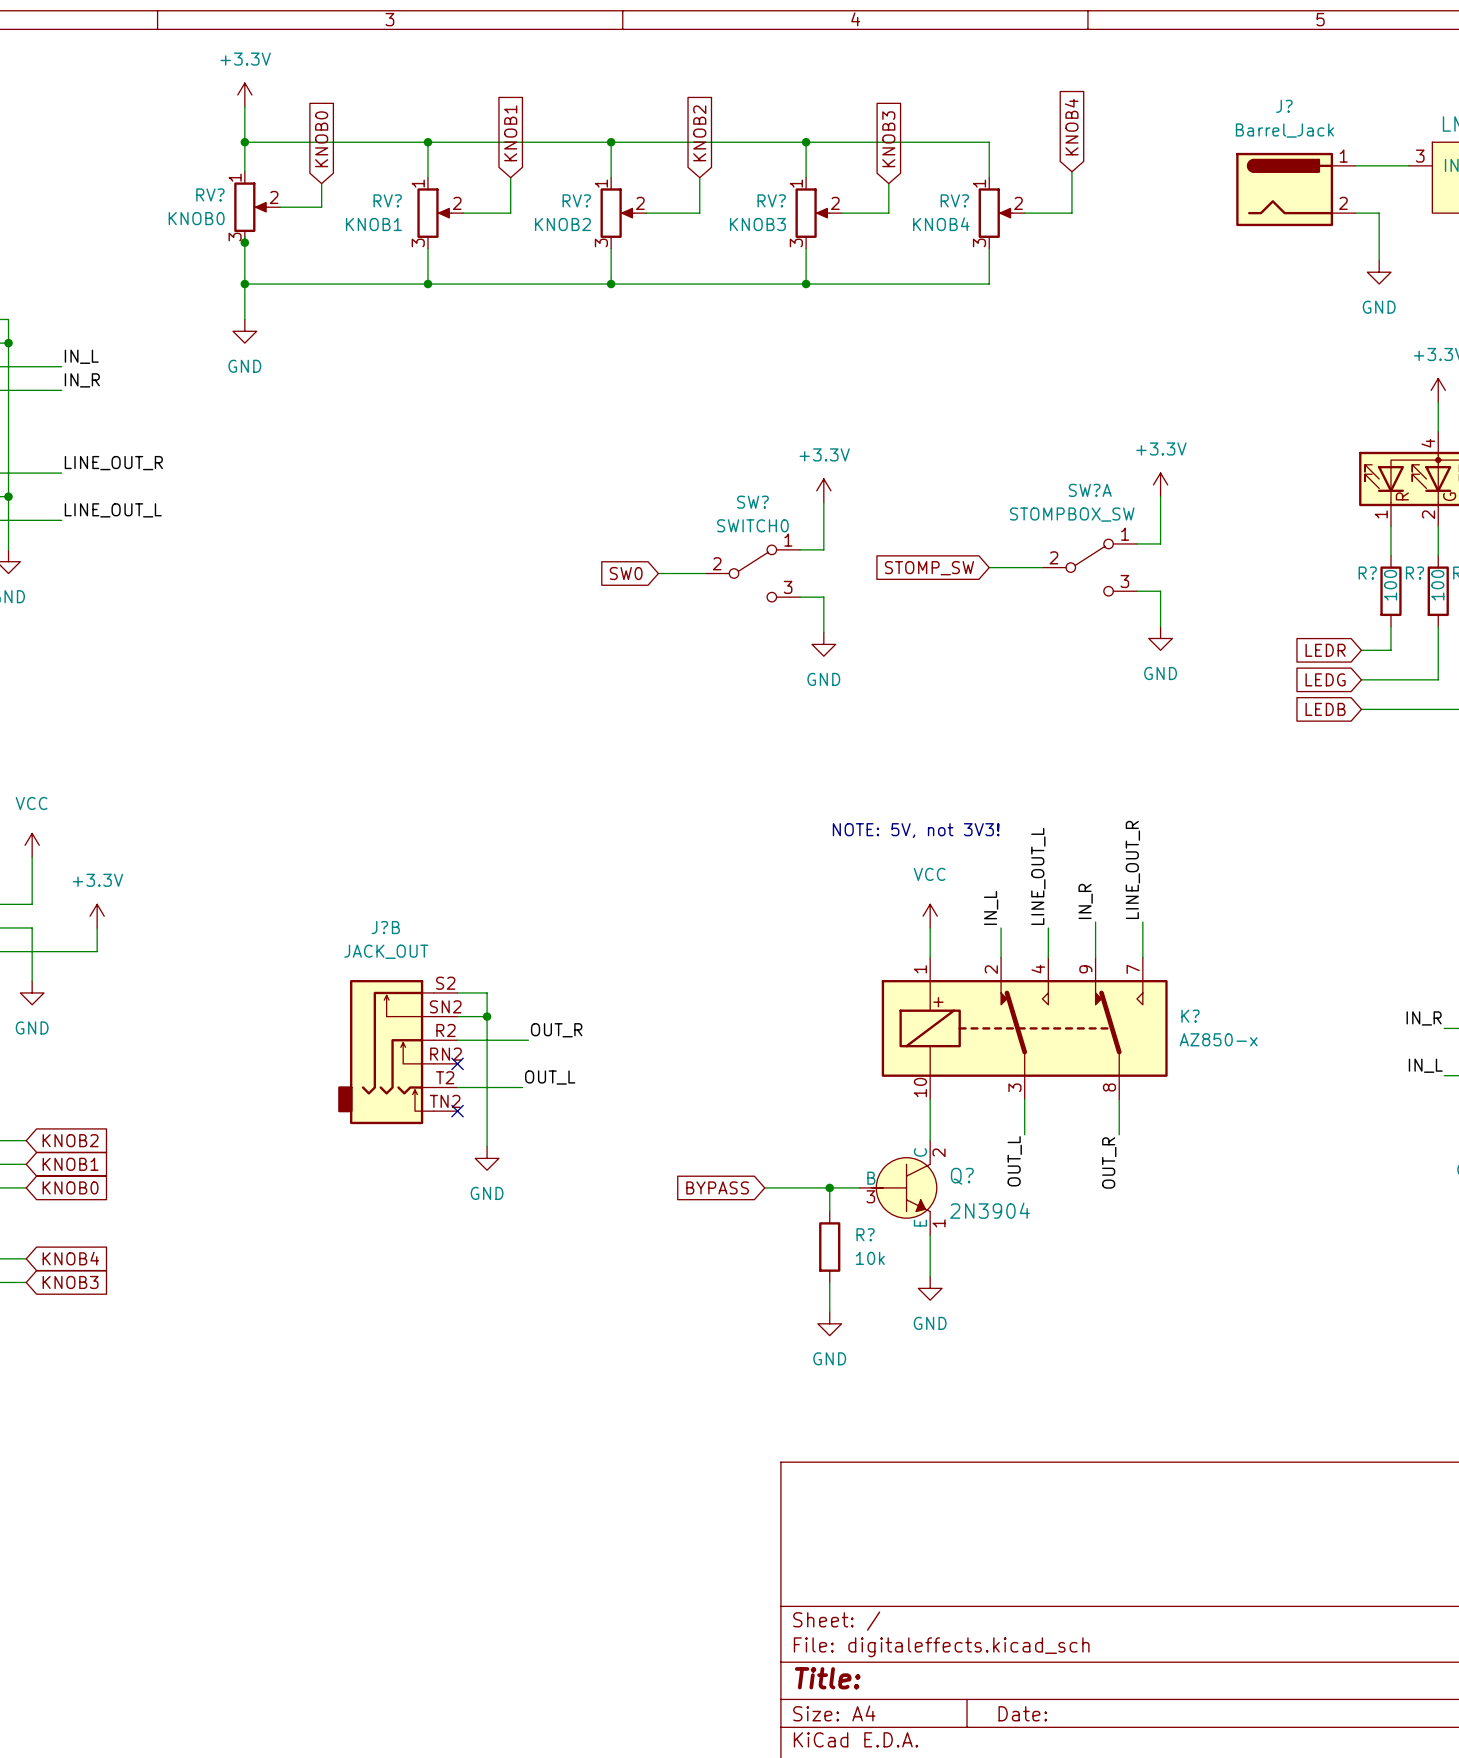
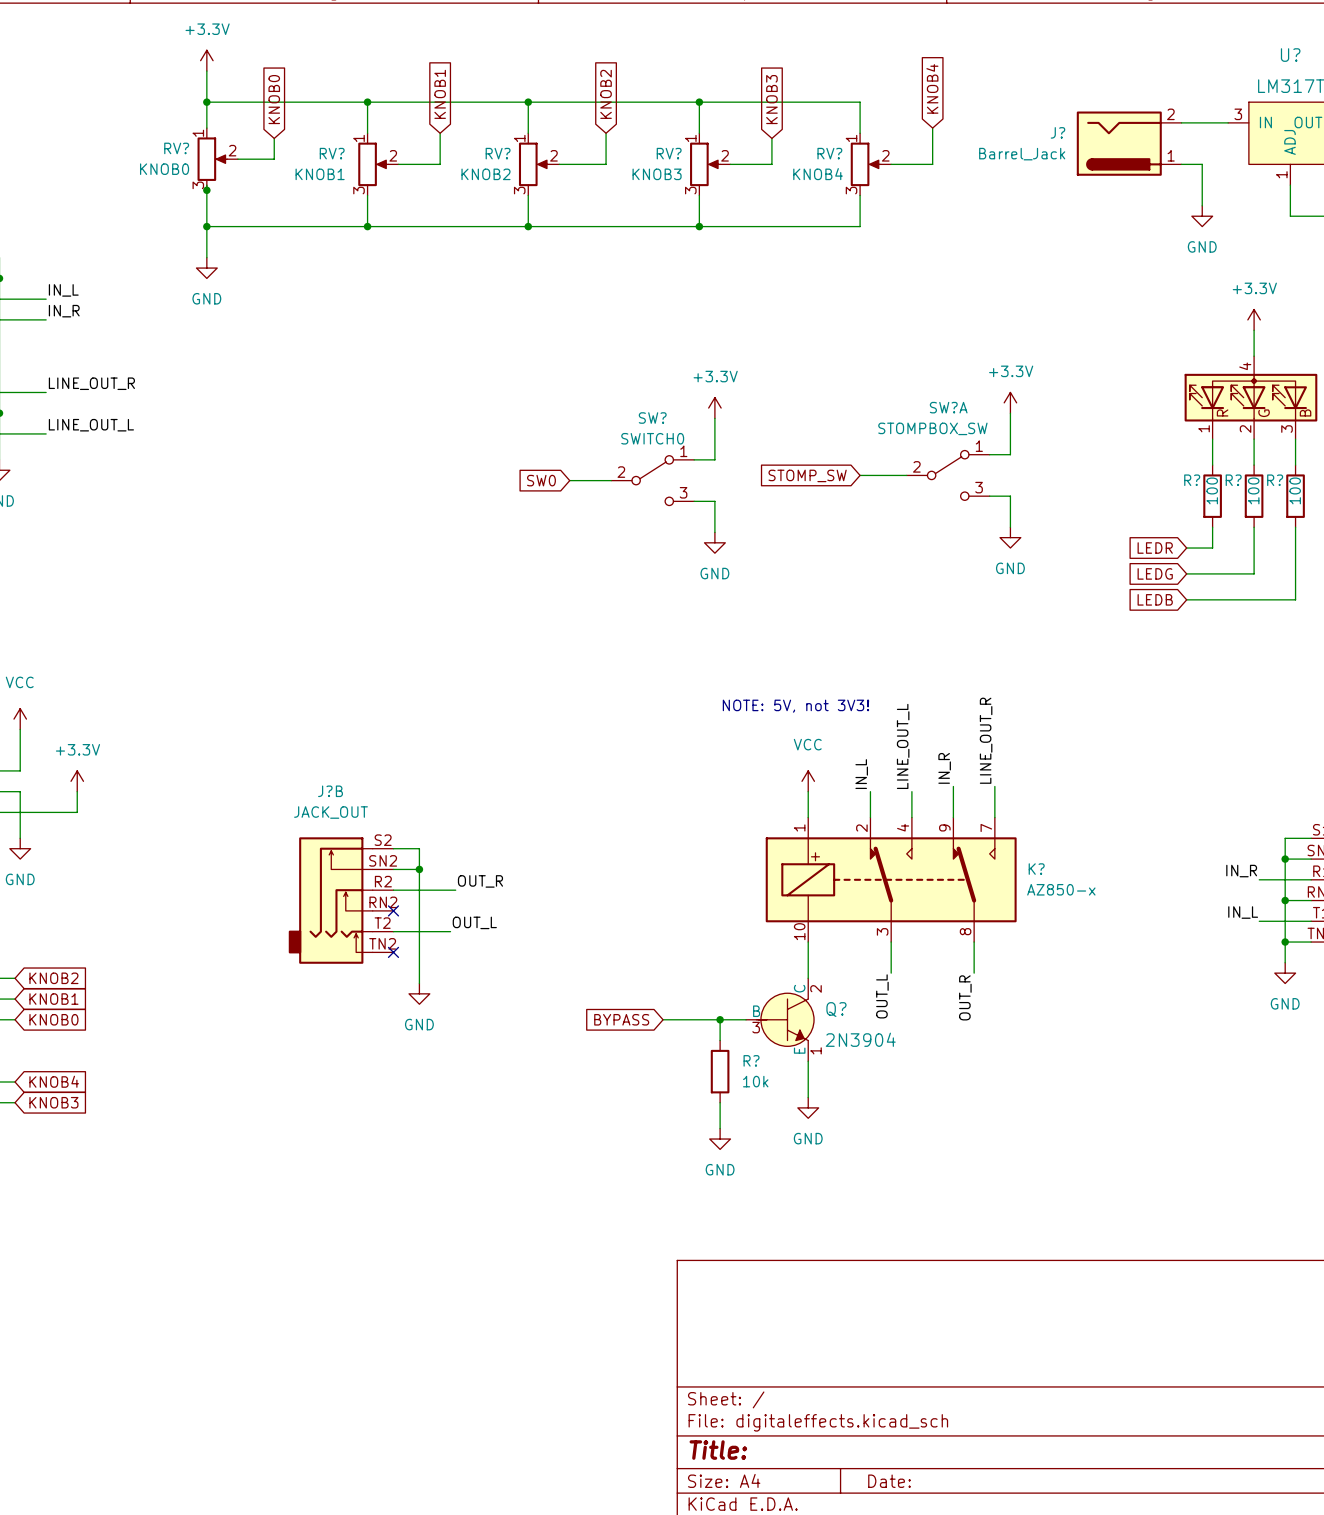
J? name position: J? (1284, 106) -> J? (1057, 132)
J? value position: Barrel_Jack (1284, 130) -> Barrel_Jack (1022, 154)
J? flip: as is (1284, 189) -> up-down (1119, 143)

